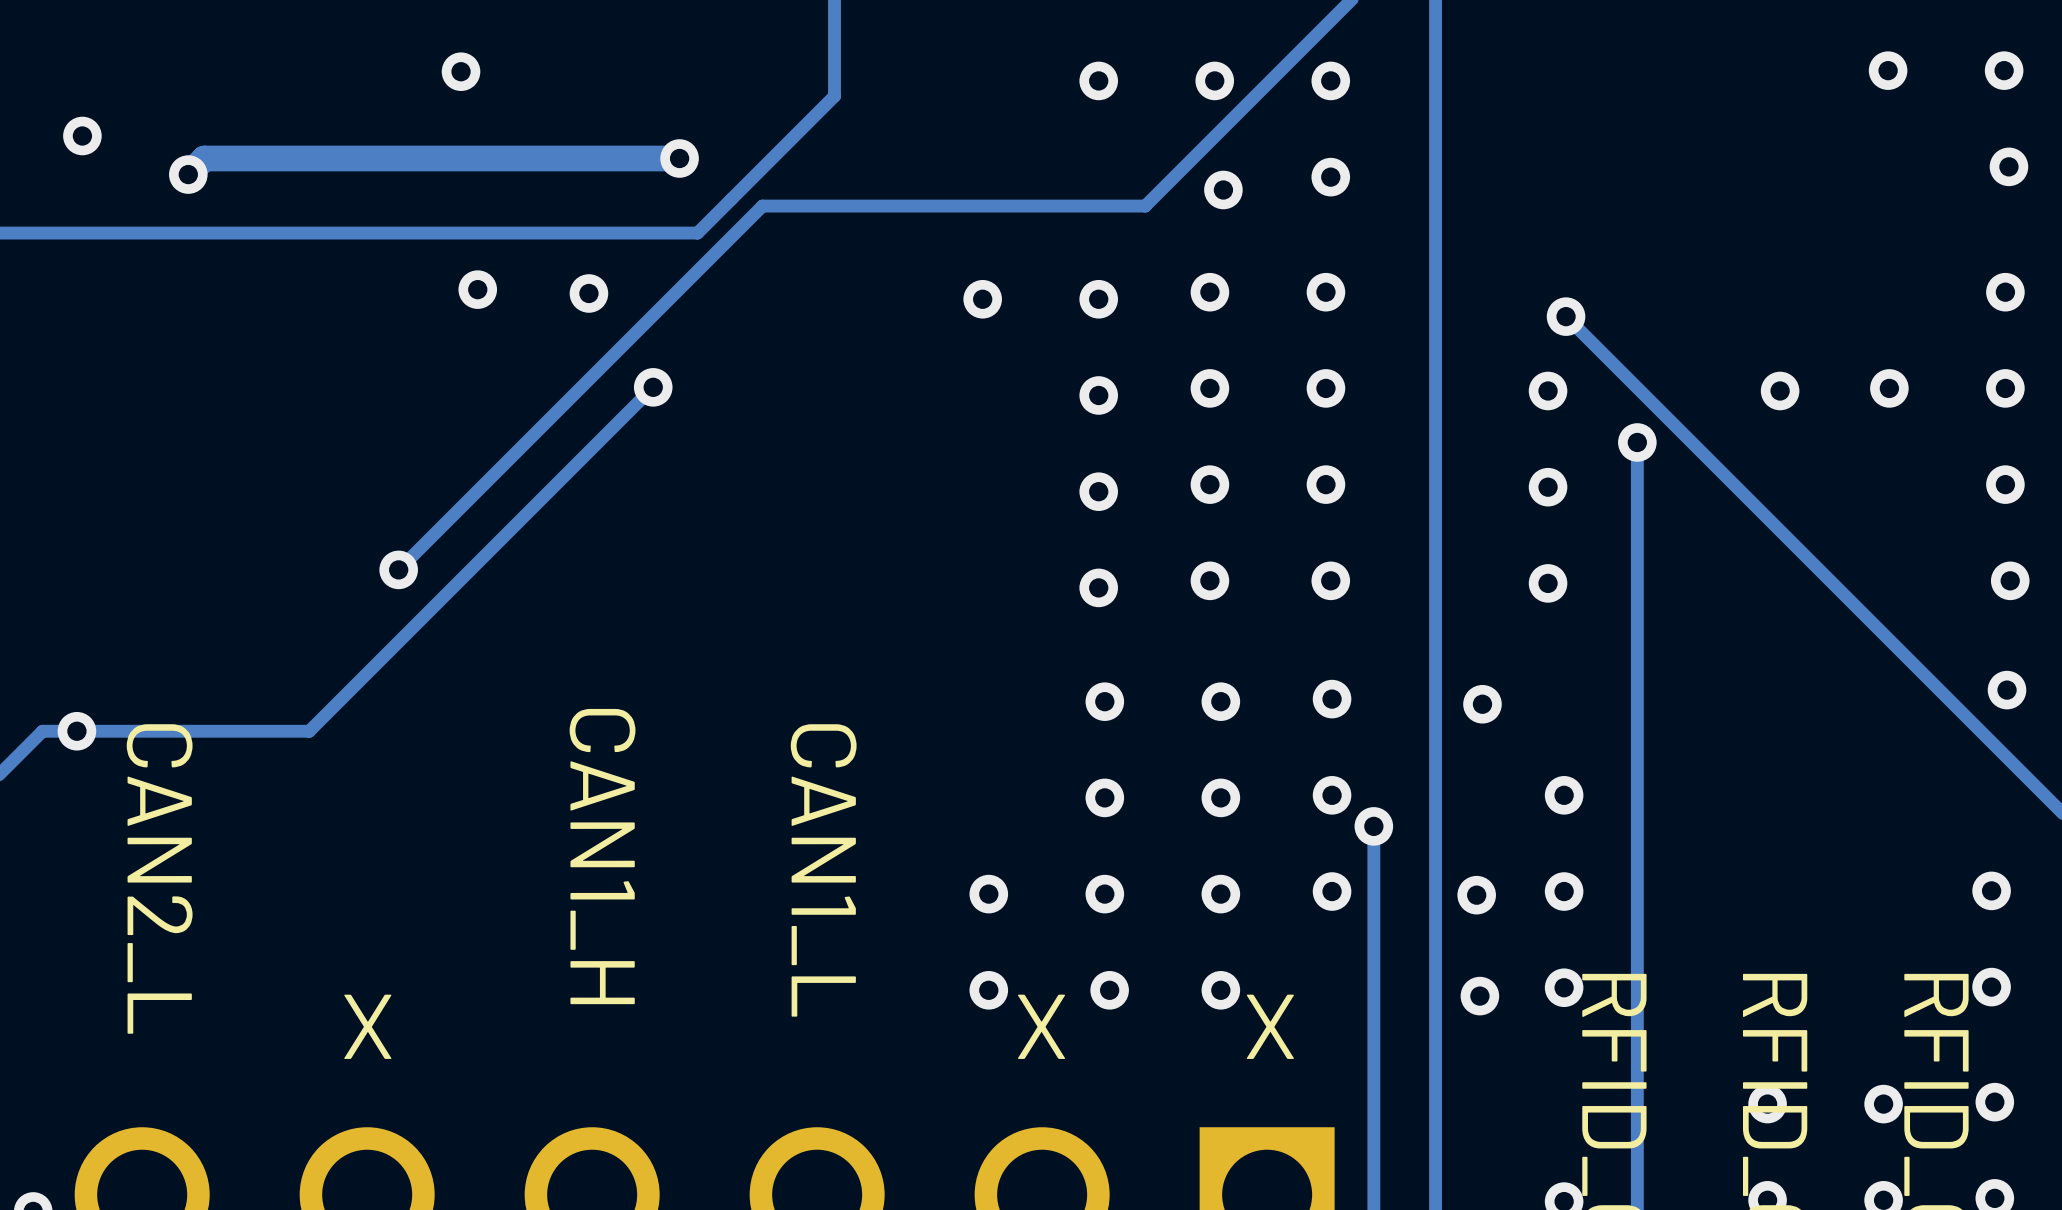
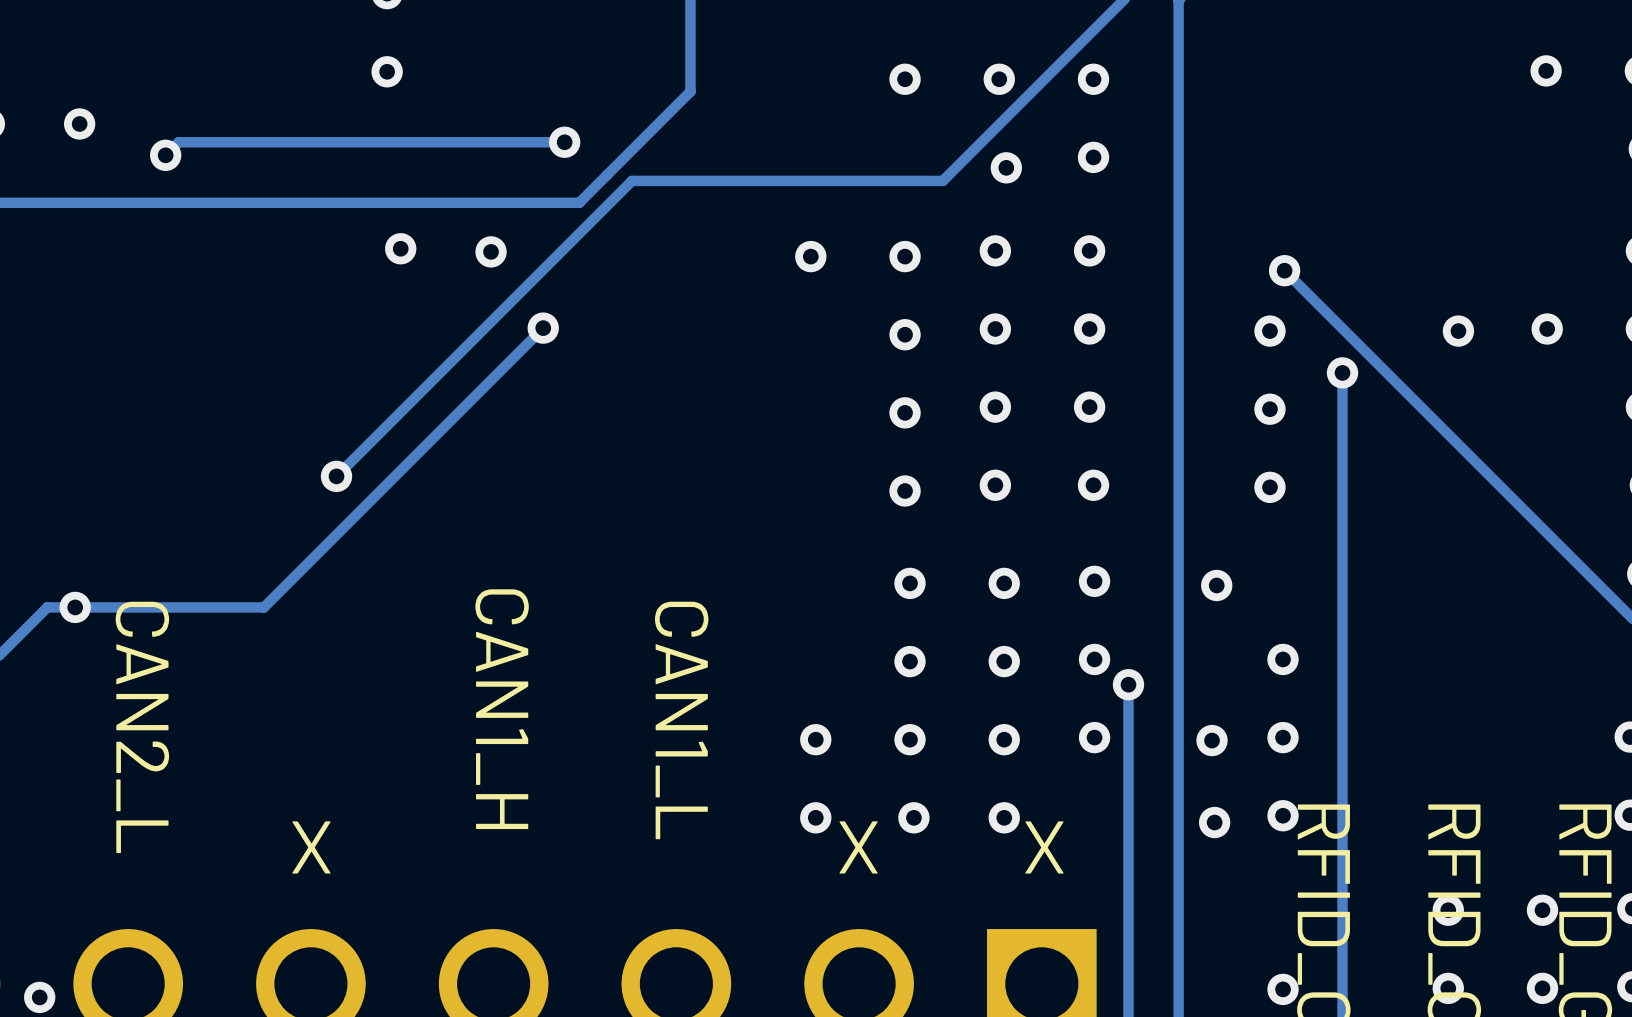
track width: thick (679, 158) (204, 158) (188, 174) -> thin (564, 142) (178, 142) (165, 155)

